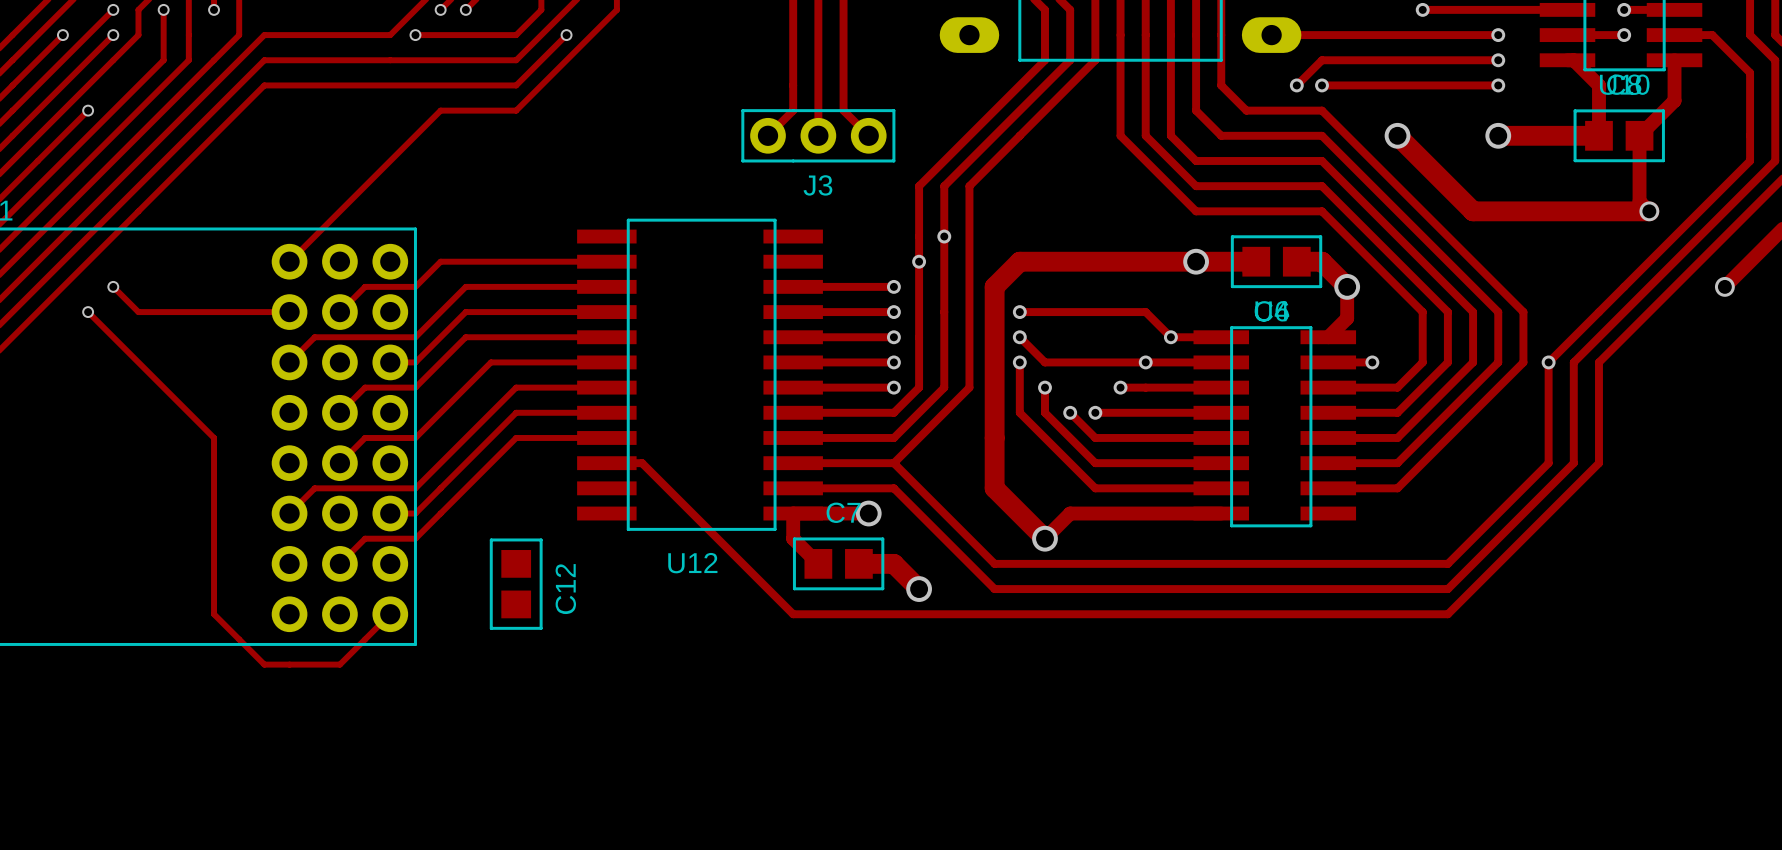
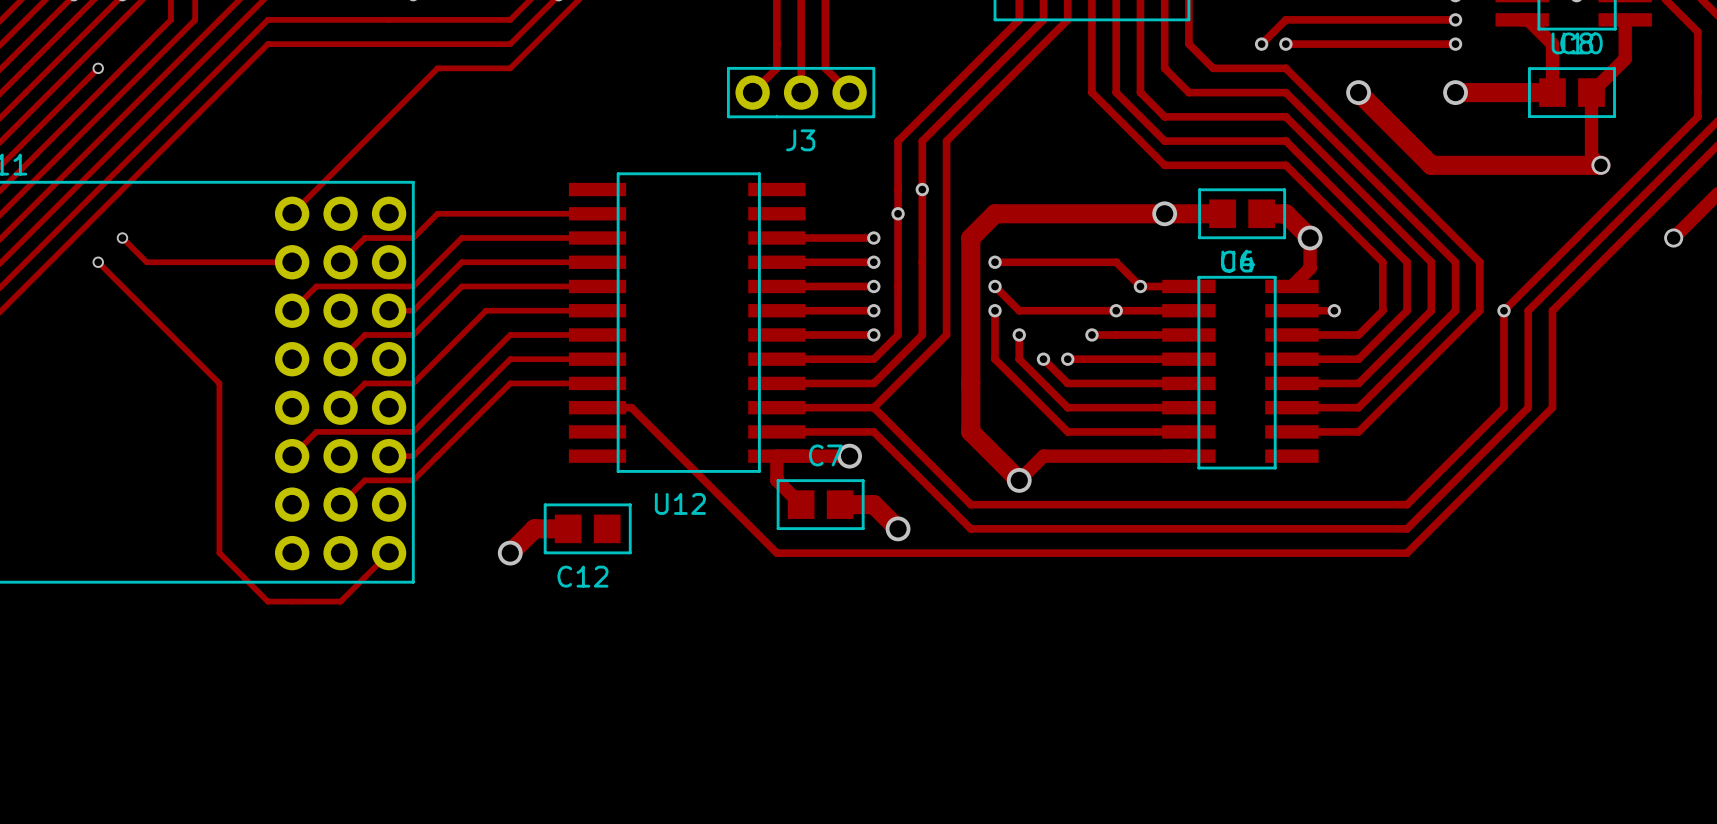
C12 rotation: 0° (516, 584) -> 90° clockwise (587, 528)
C12 position: (516, 584) -> (587, 528)
track: none -> (568, 528) (534, 528) (510, 553)
via: none -> (510, 553)

